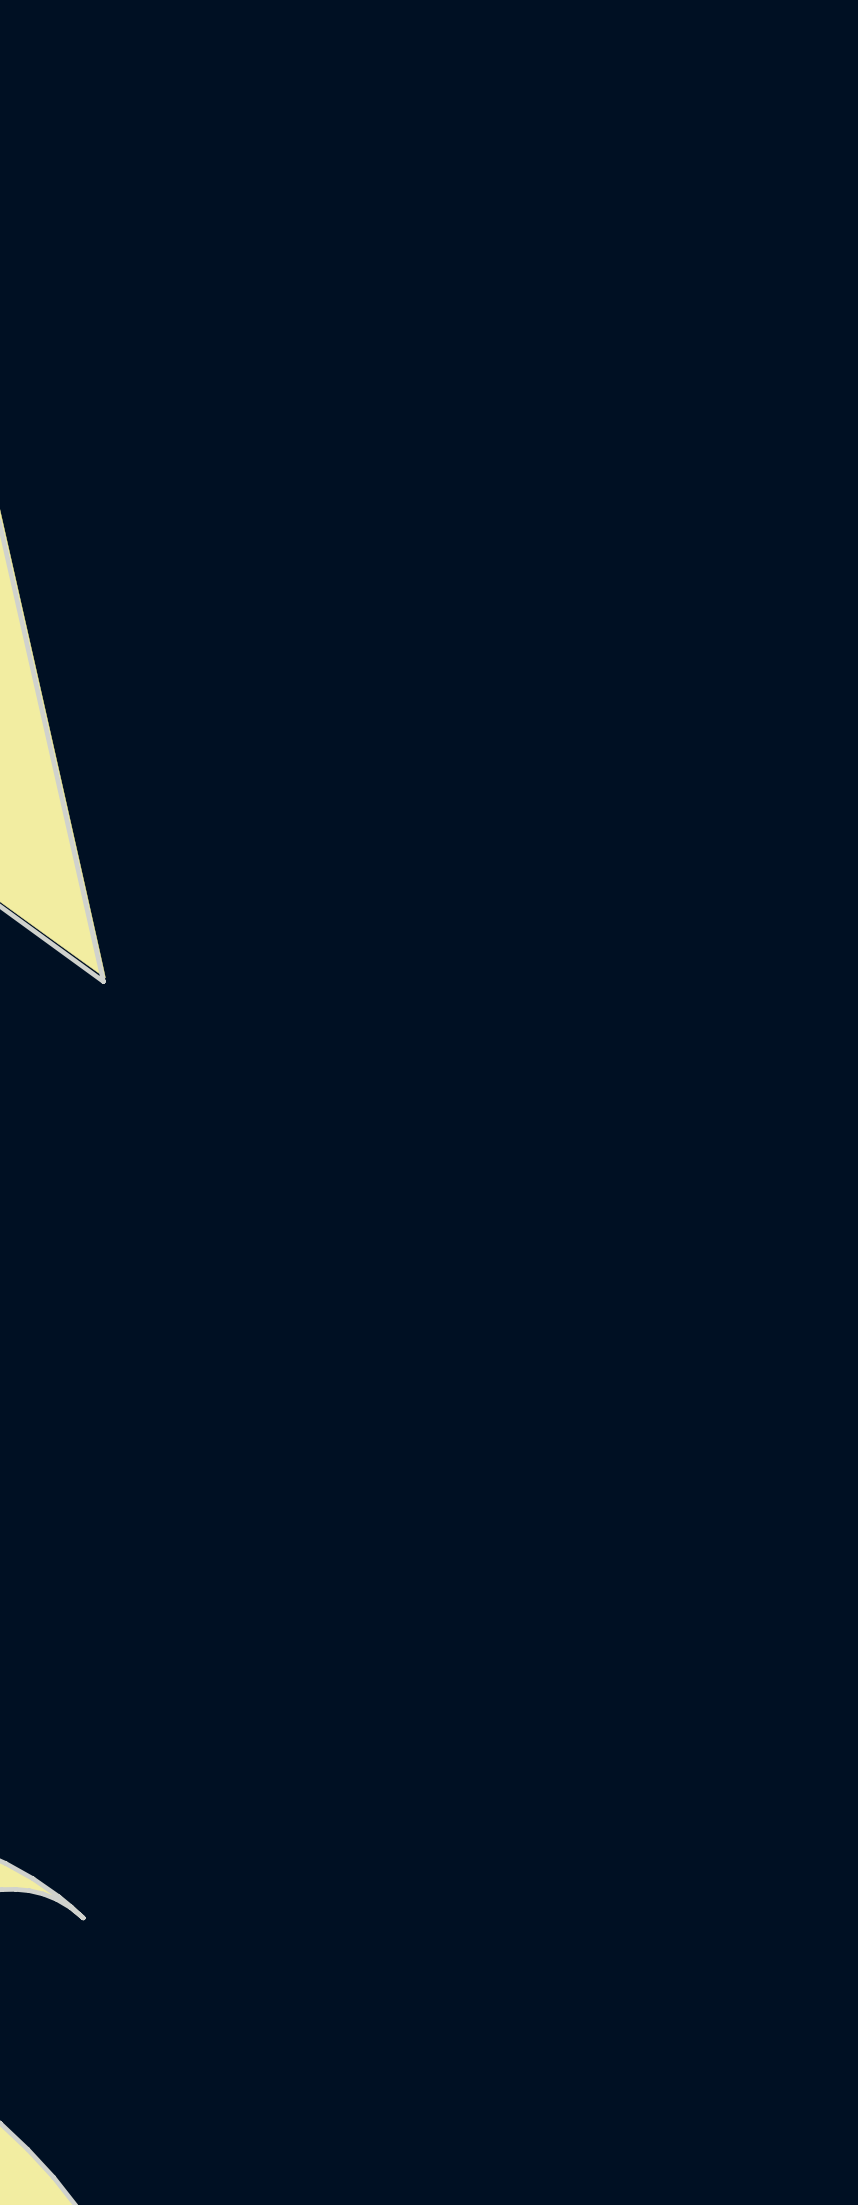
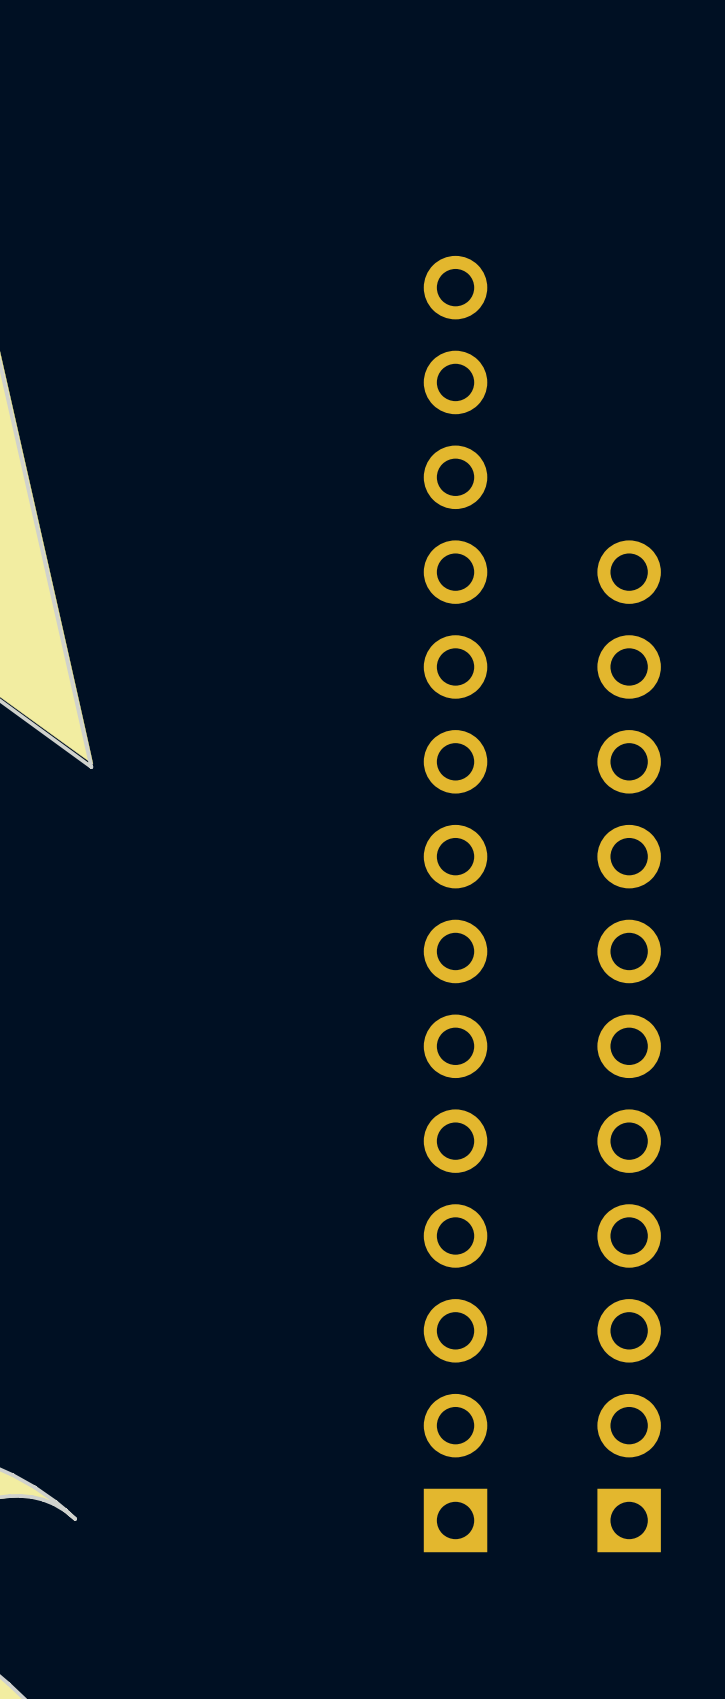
part: none -> (455, 904)
part: none -> (629, 1046)

